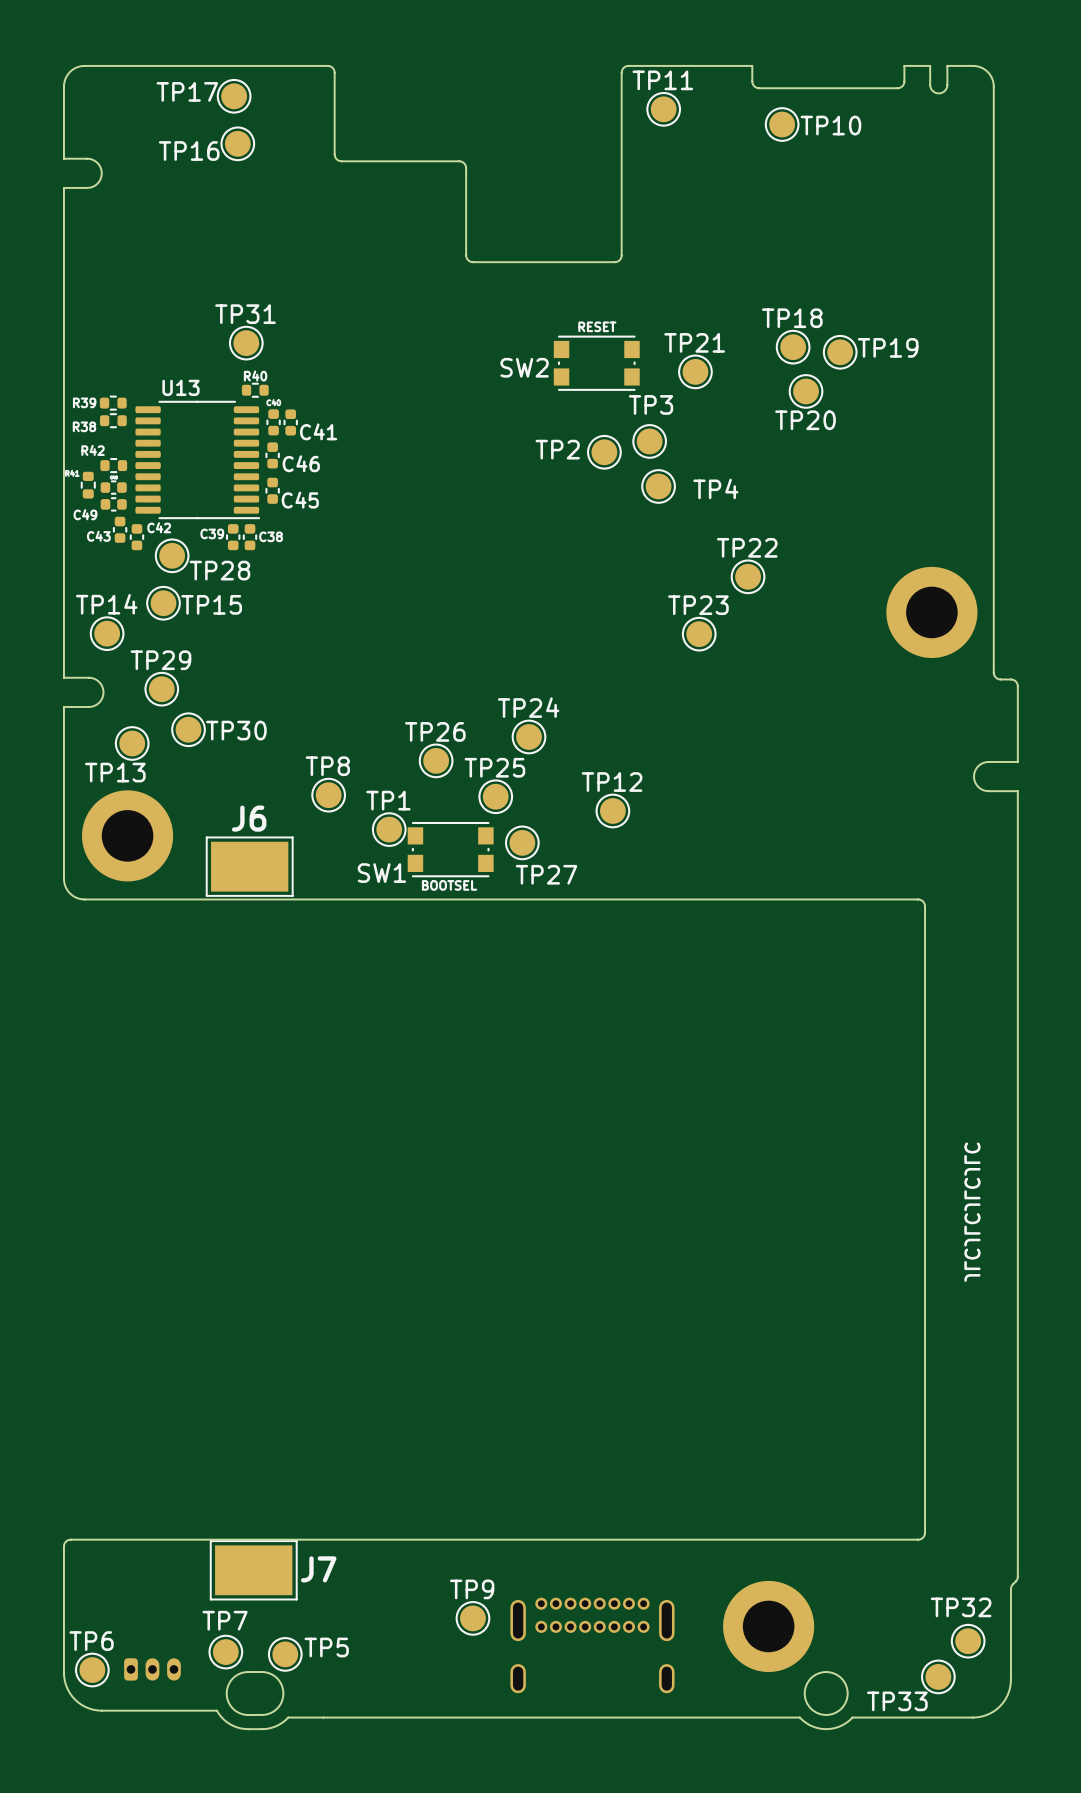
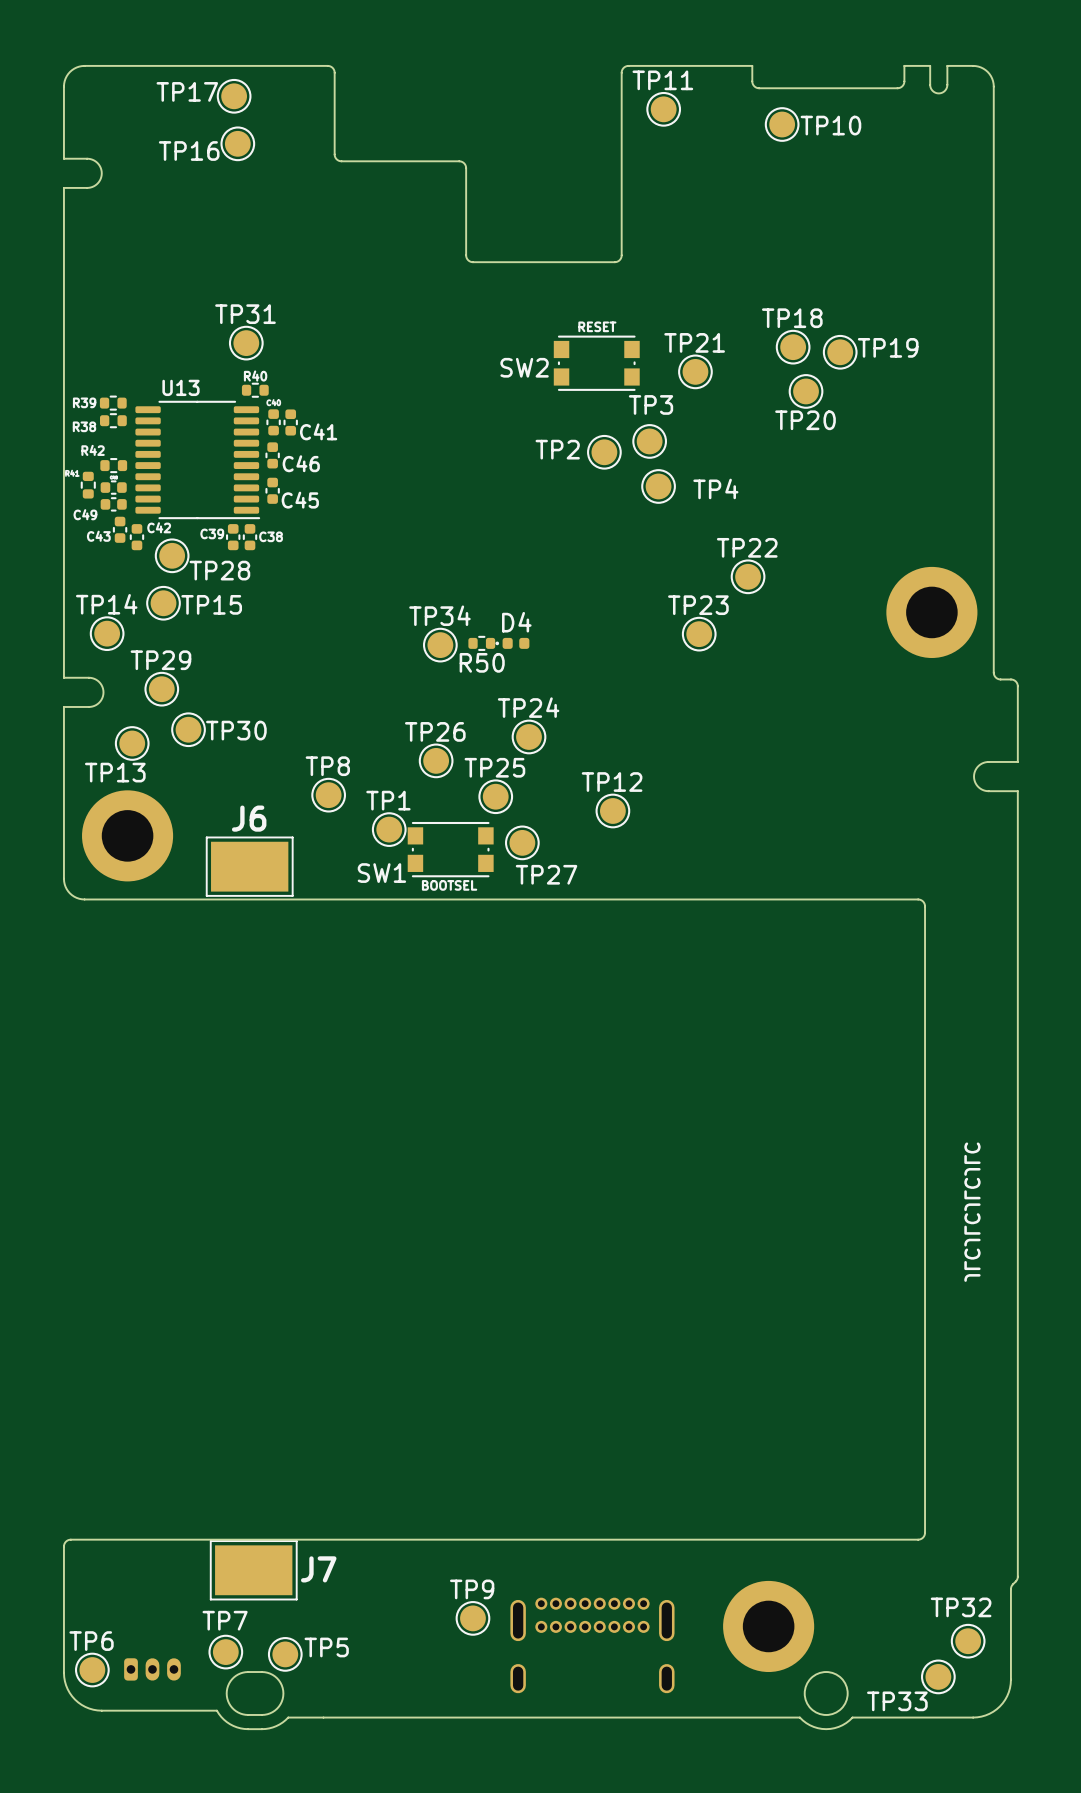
R50: none -> (481, 643)
D4: none -> (512, 643)
TP34: none -> (440, 645)

